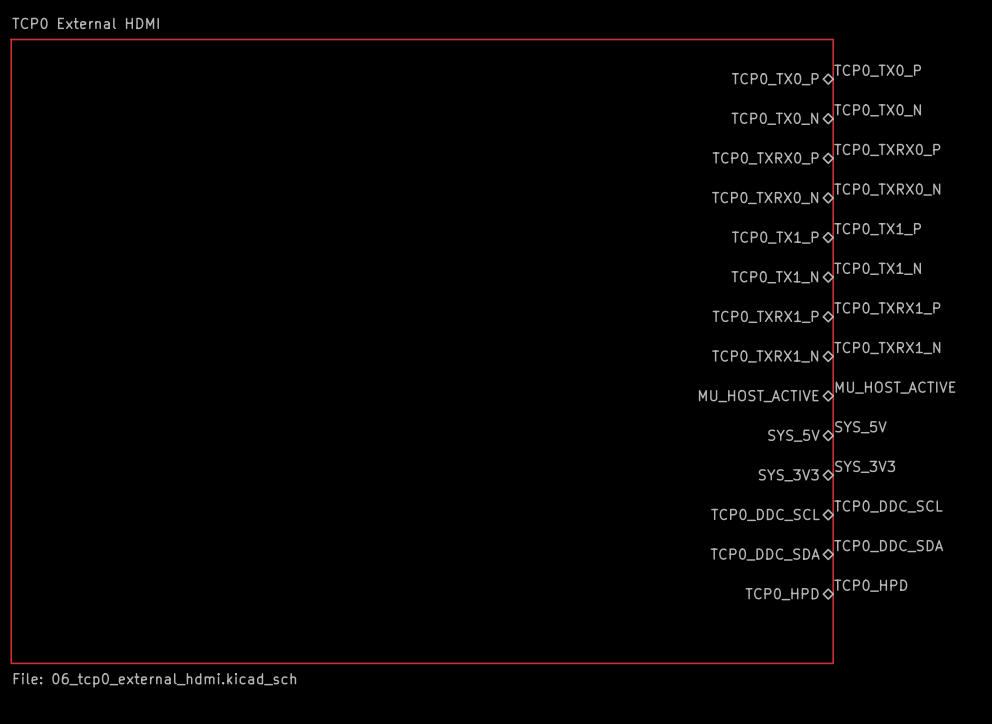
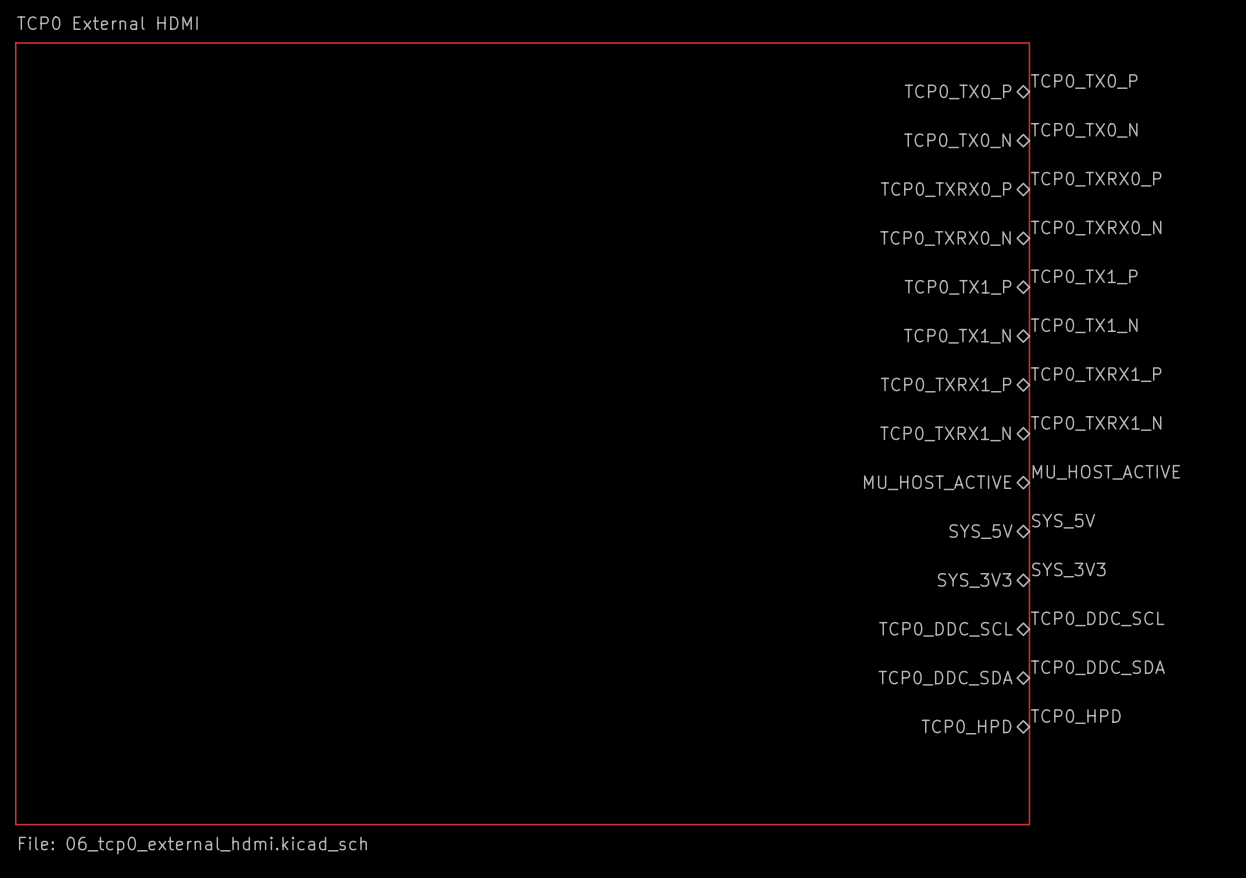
sheet TCP0 External HDMI shape: [10, 38, 834, 664] -> [15, 42, 1031, 826]

